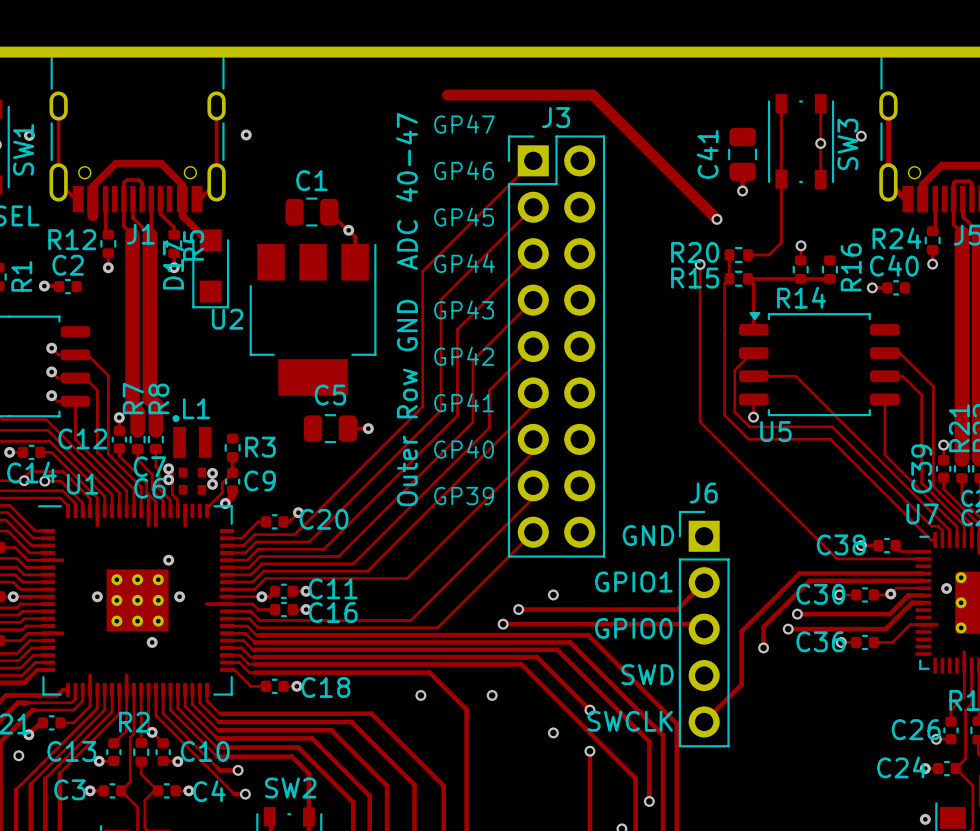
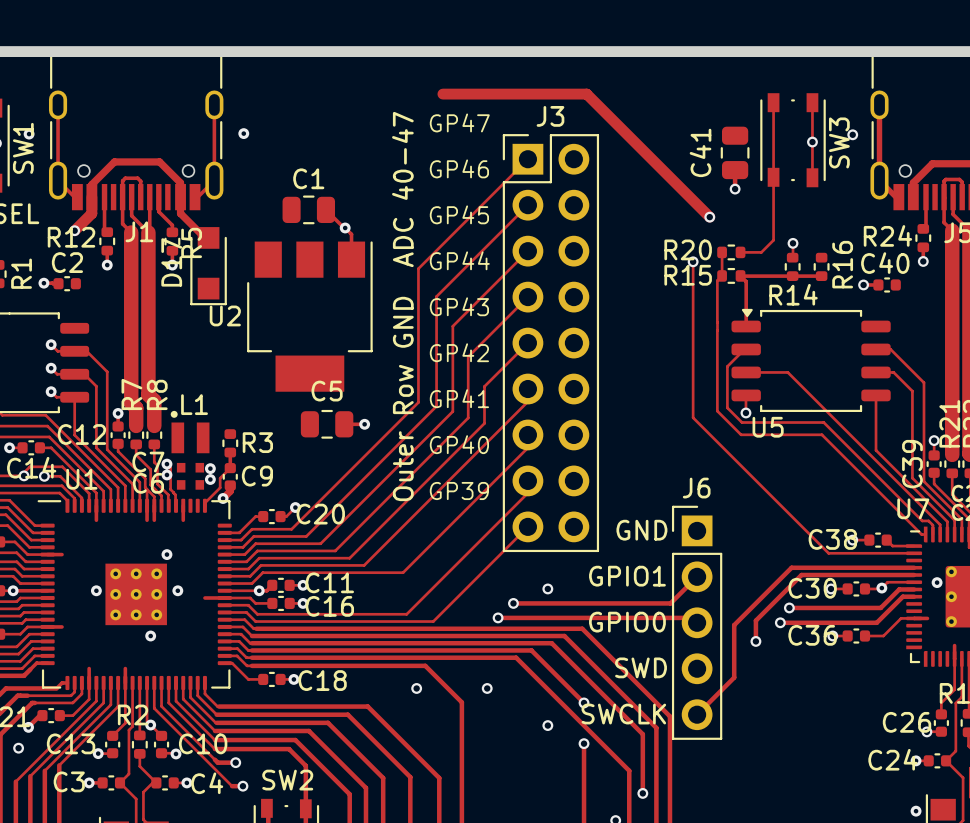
track: none -> (91, 213) (74, 230)
via: none -> (74, 230)

